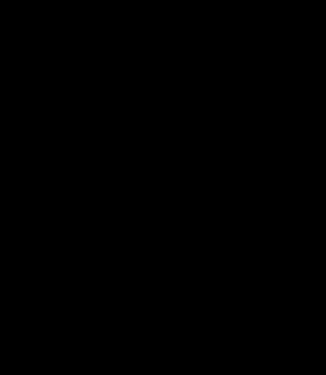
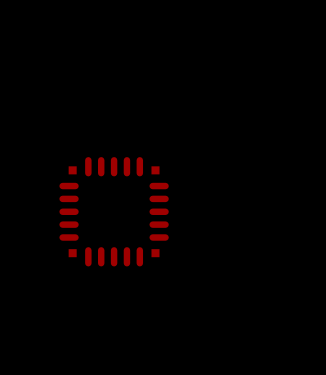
part: none -> (114, 211)

